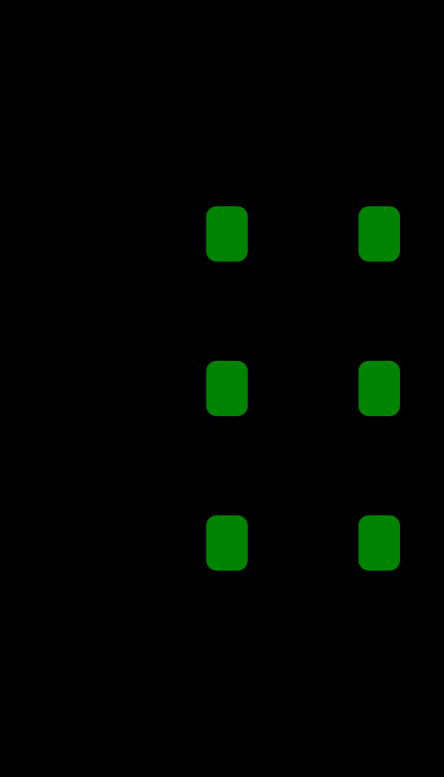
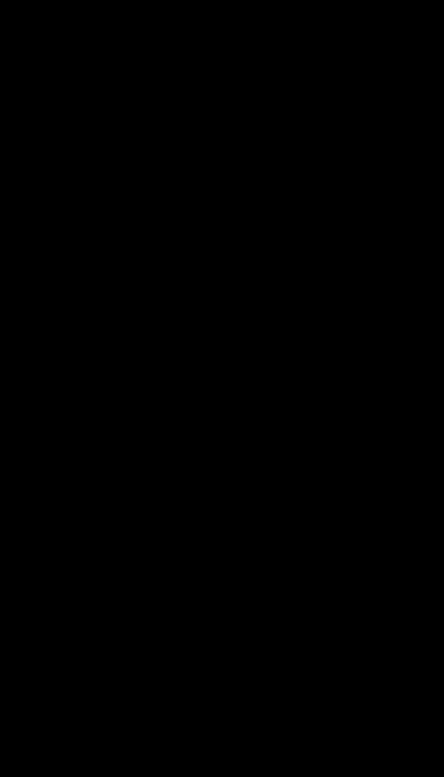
part: (303, 233) -> none
part: (303, 388) -> none
part: (303, 542) -> none

